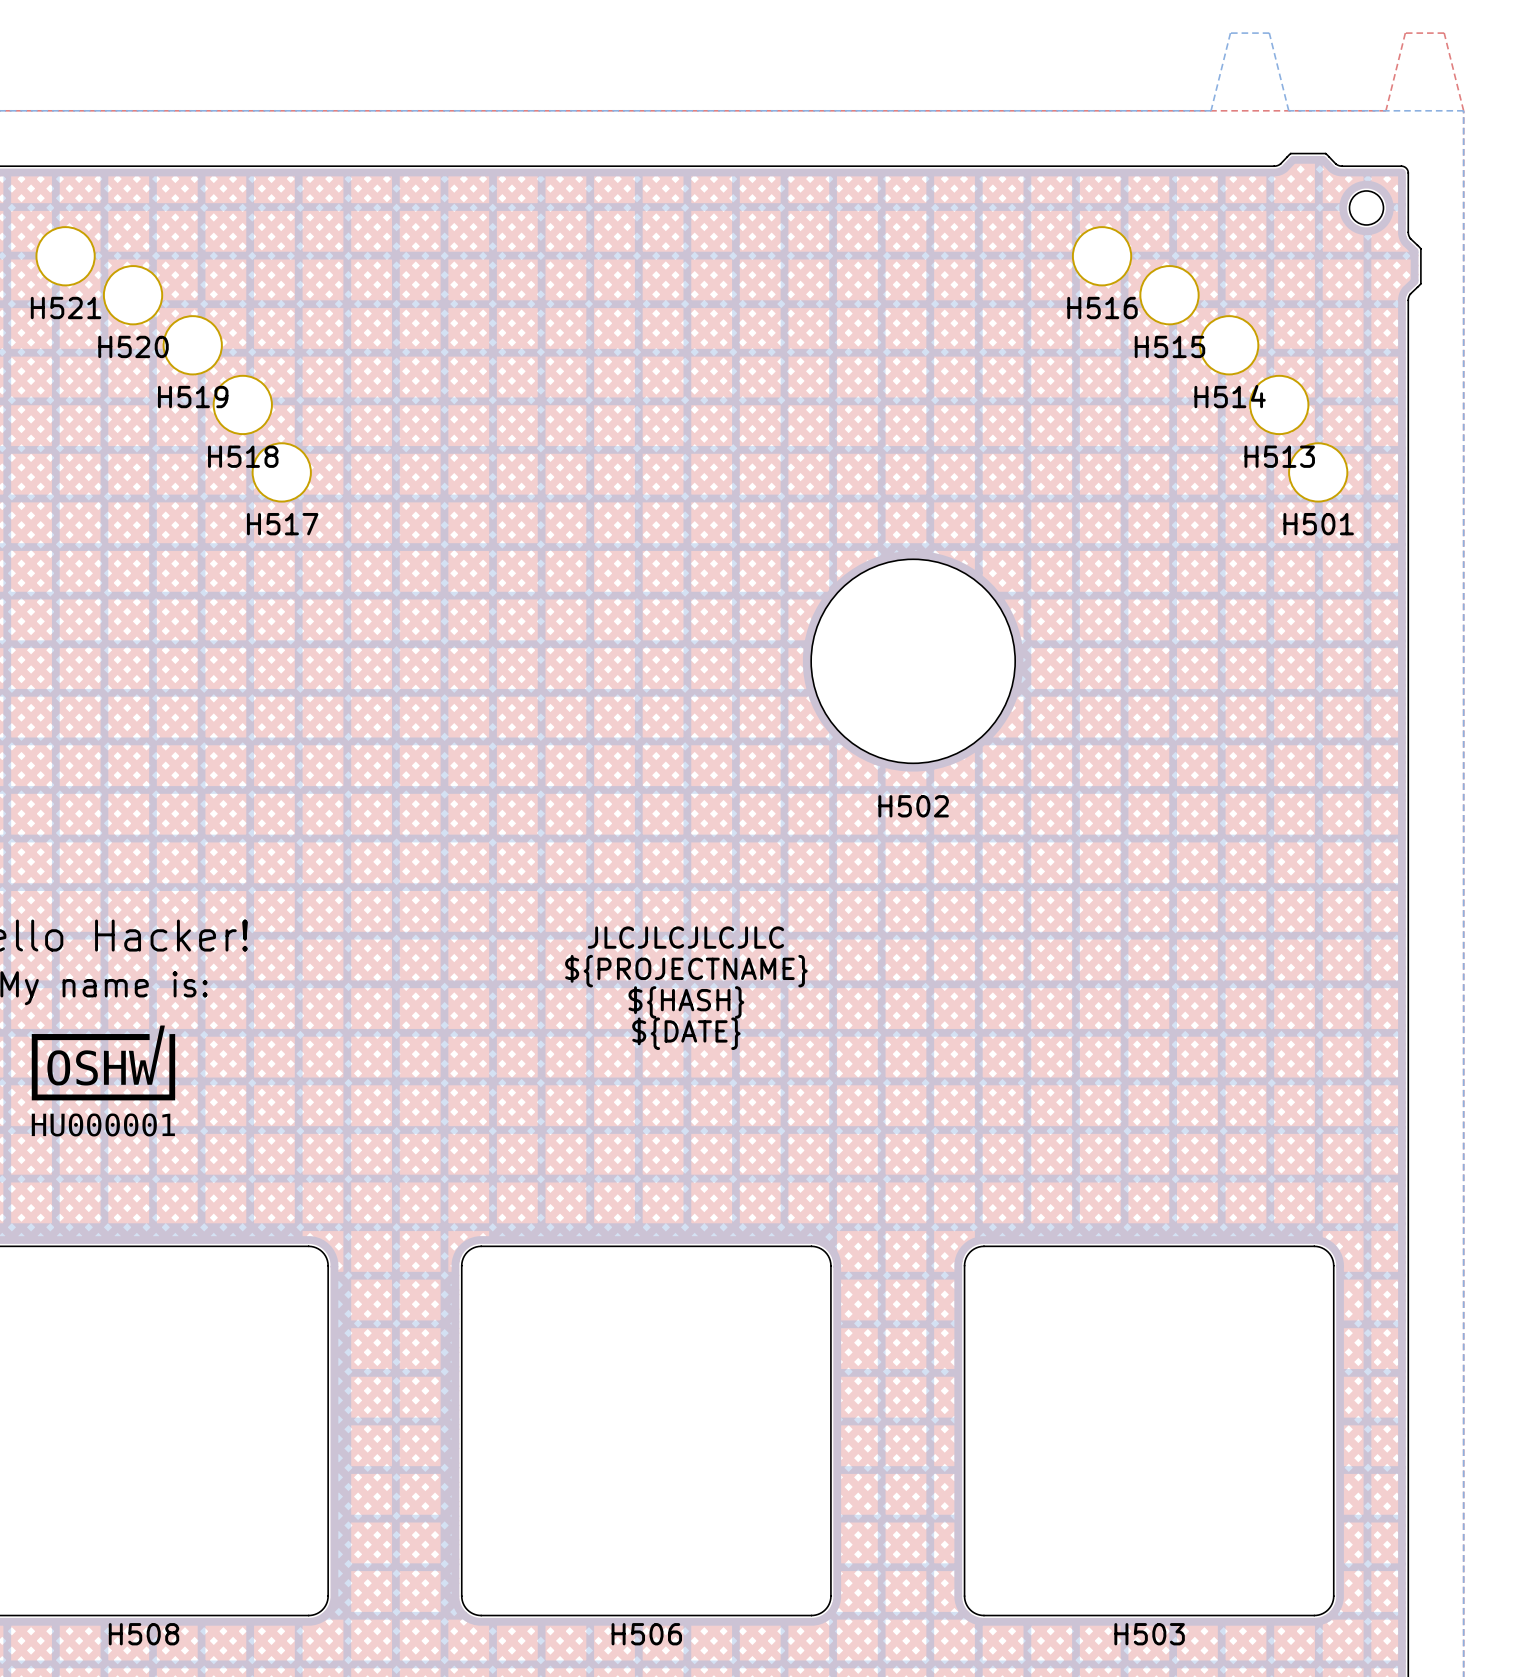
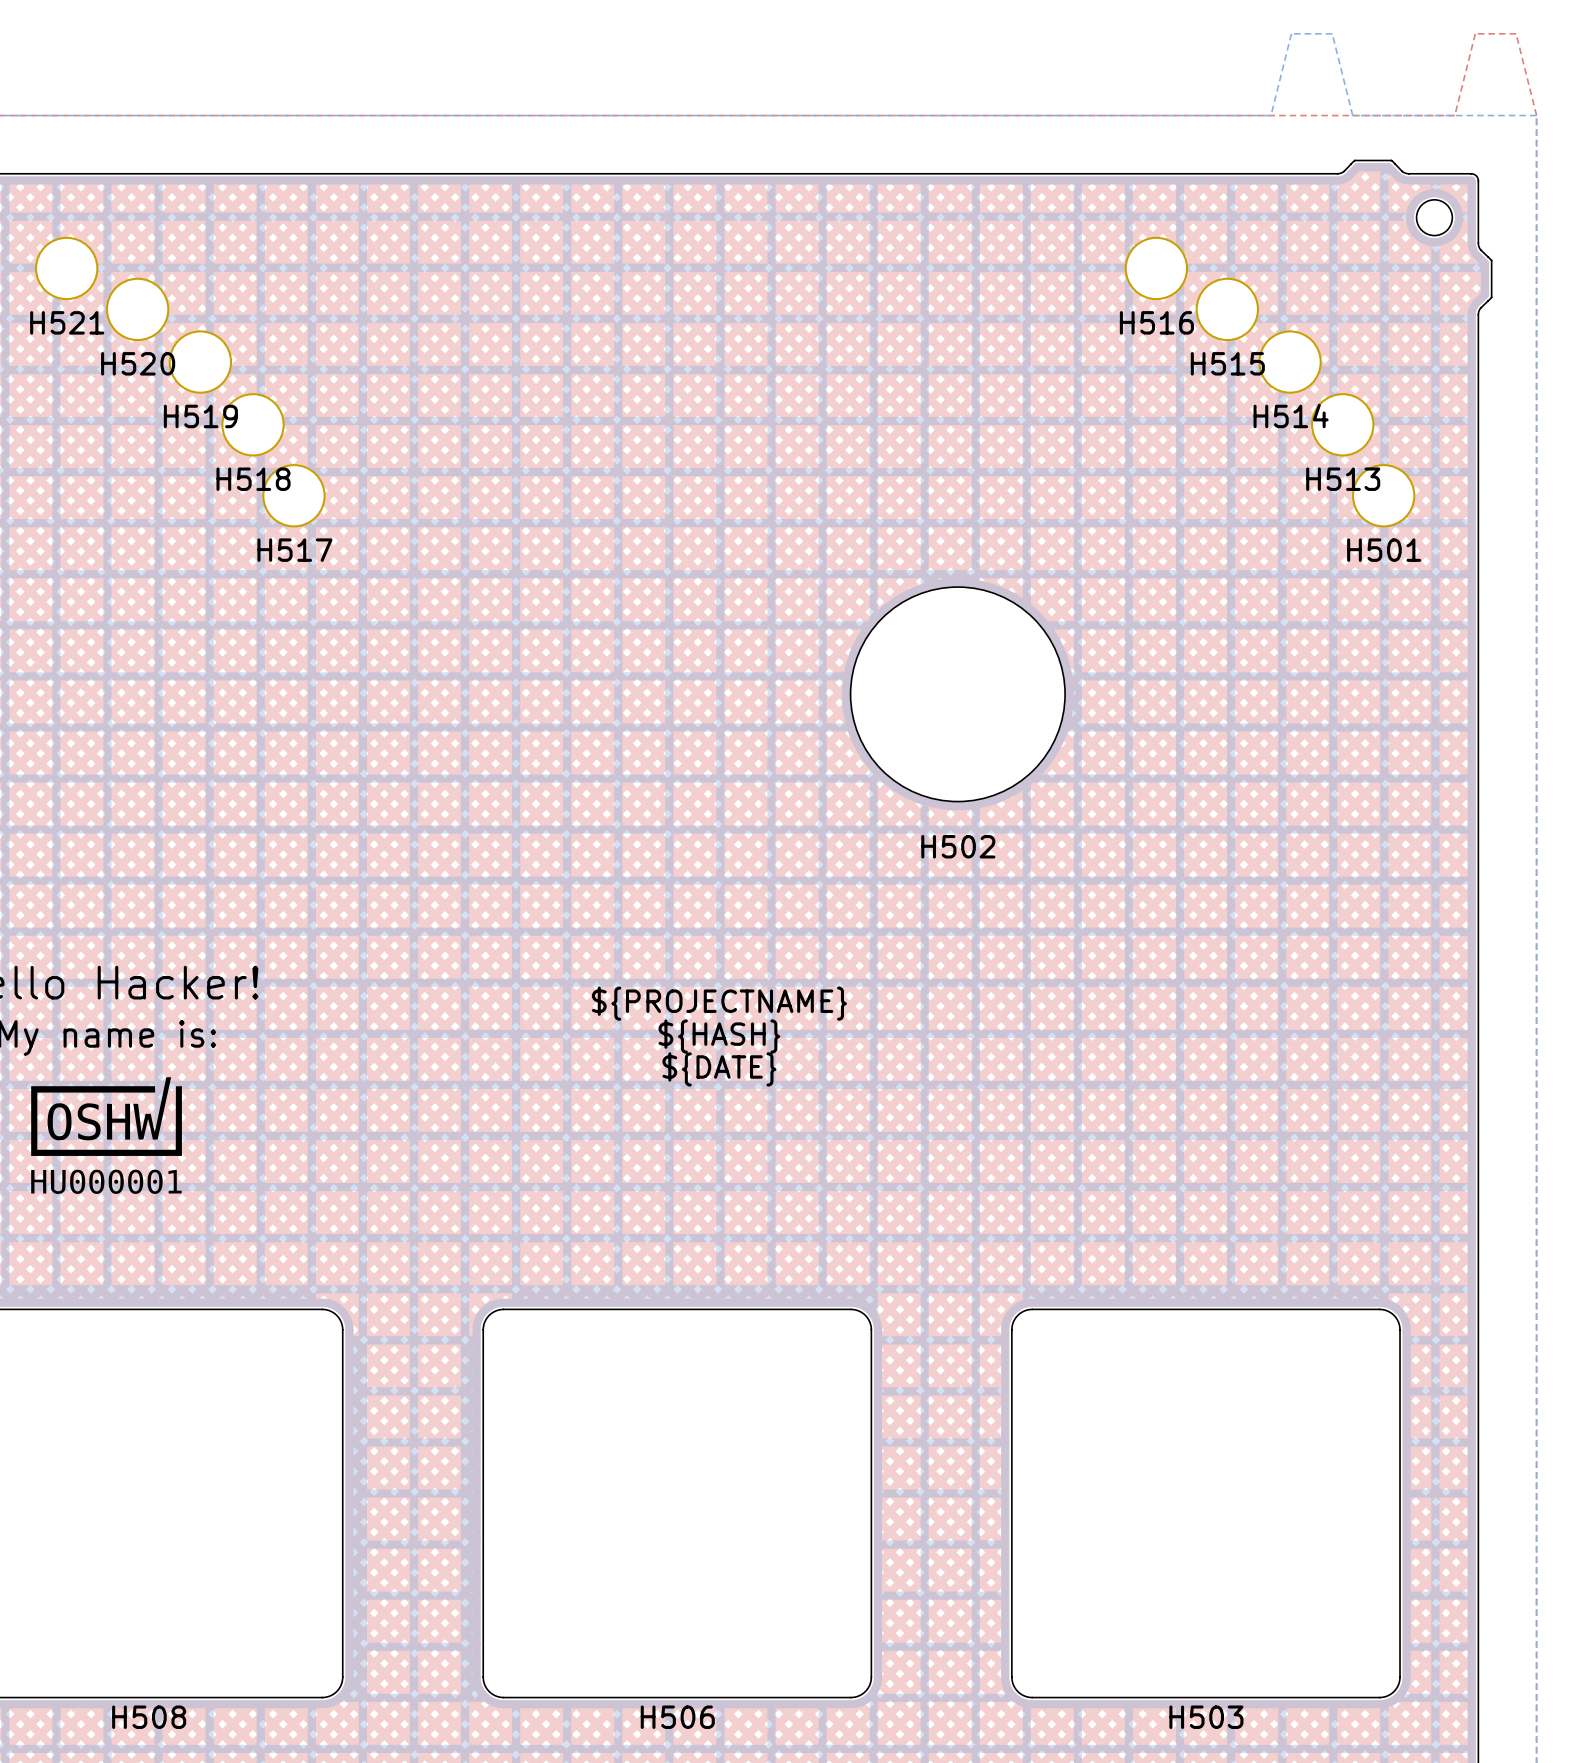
text: JLCJLCJLCJLC (685, 937) -> none
text position: ${PROJECTNAME} (686, 971) -> ${PROJECTNAME} (719, 1003)
text position: ${HASH} (686, 1002) -> ${HASH} (719, 1036)
text position: ${DATE} (686, 1033) -> ${DATE} (719, 1069)

